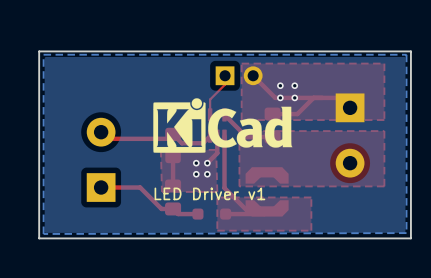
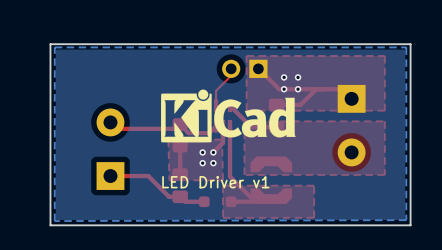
part rotation: 0° (239, 75) -> 180° (244, 68)

